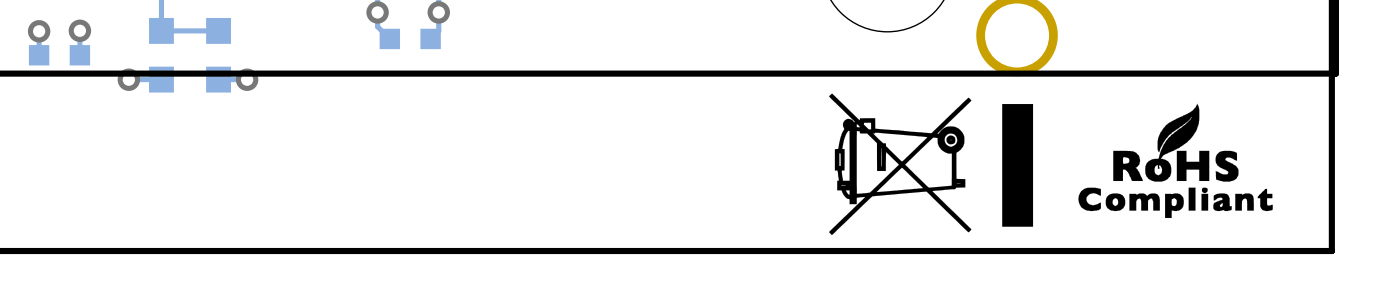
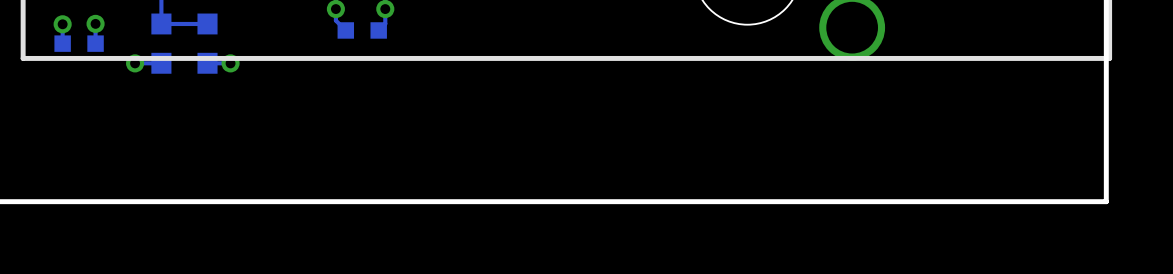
drawing: [829, 93, 1273, 236] -> none

